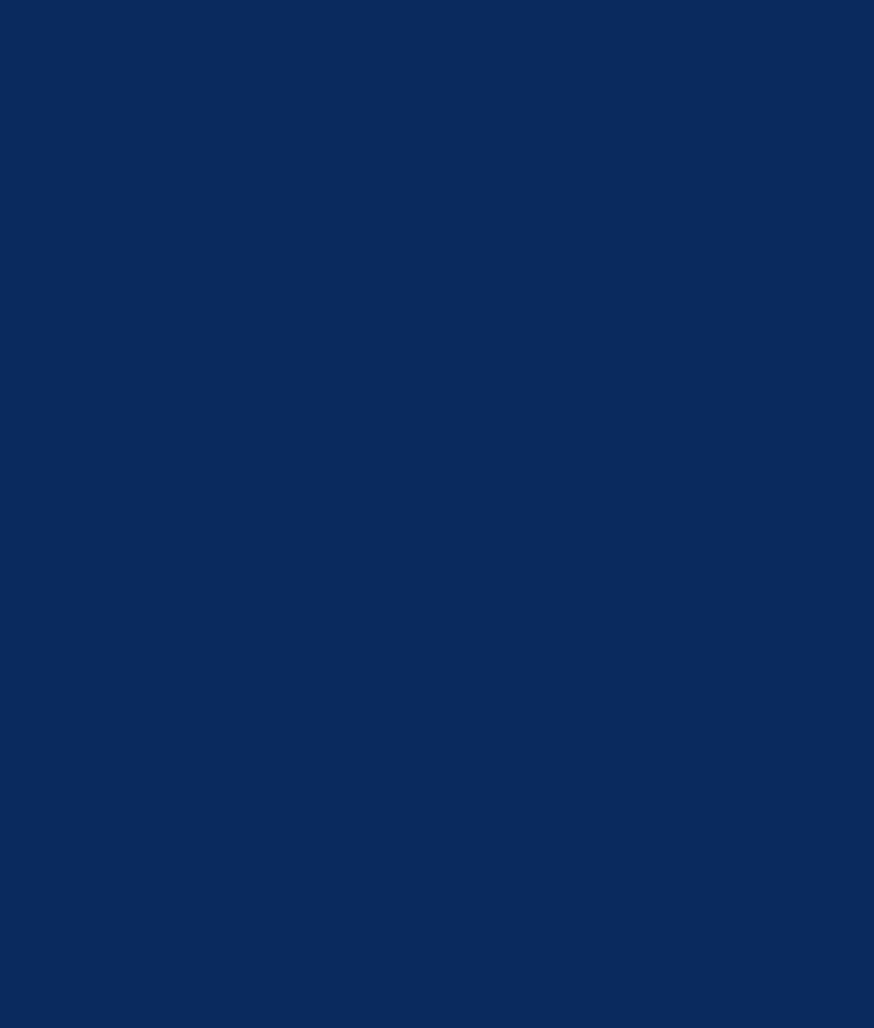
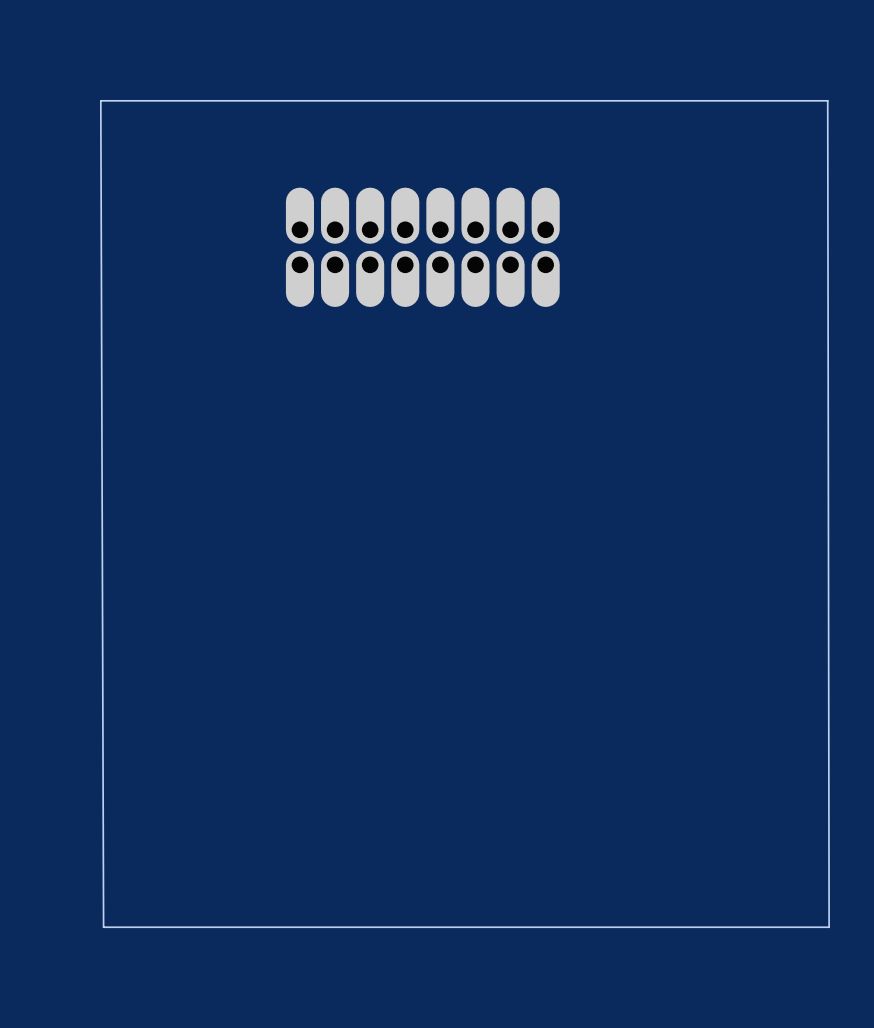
board edge: none -> (827, 100) (100, 100) (103, 927) (829, 927) (827, 100)
part: none -> (422, 247)

